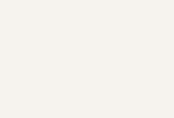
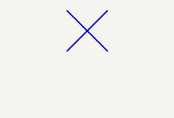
no-connect mark: none -> (87, 30)

